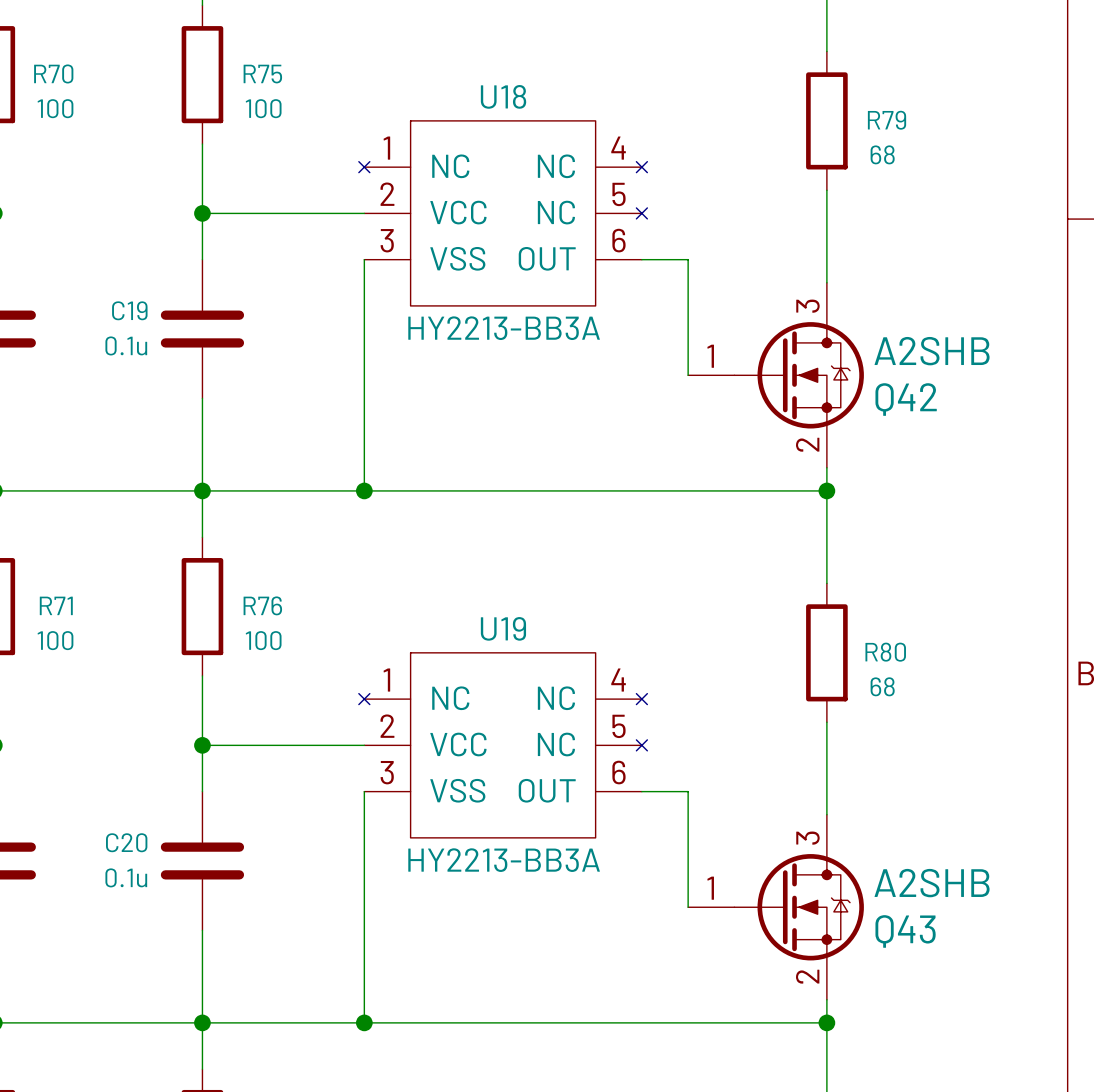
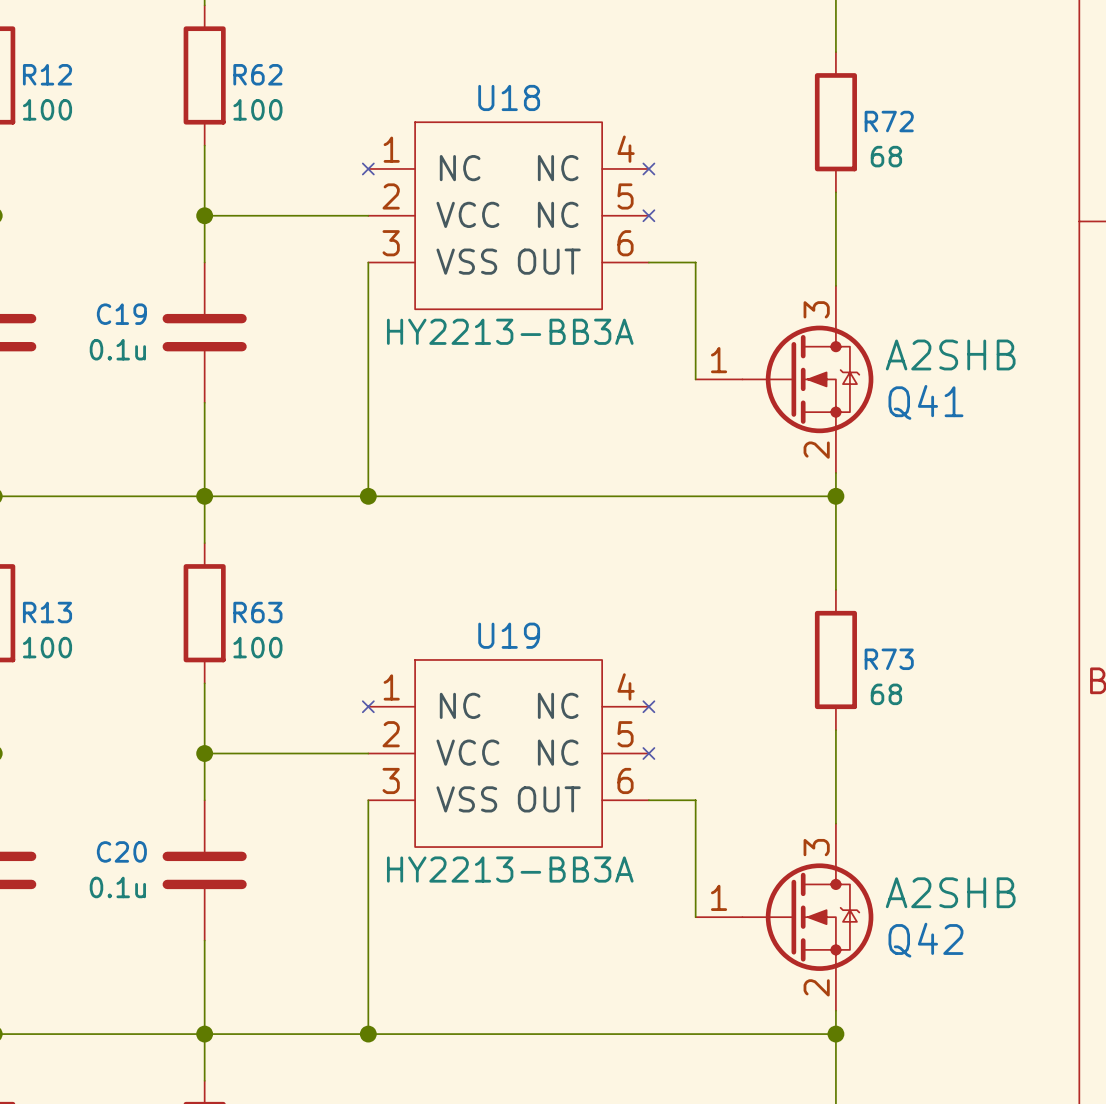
R70 name: R70 (53, 73) -> R12 (47, 74)
R75 name: R75 (262, 74) -> R62 (257, 74)
R79 name: R79 (887, 120) -> R72 (889, 121)
Q42 name: Q42 (906, 399) -> Q41 (925, 402)
R71 name: R71 (56, 605) -> R13 (47, 612)
R76 name: R76 (262, 605) -> R63 (257, 612)
R80 name: R80 (885, 652) -> R73 (889, 659)
Q43 name: Q43 (905, 931) -> Q42 (925, 940)

